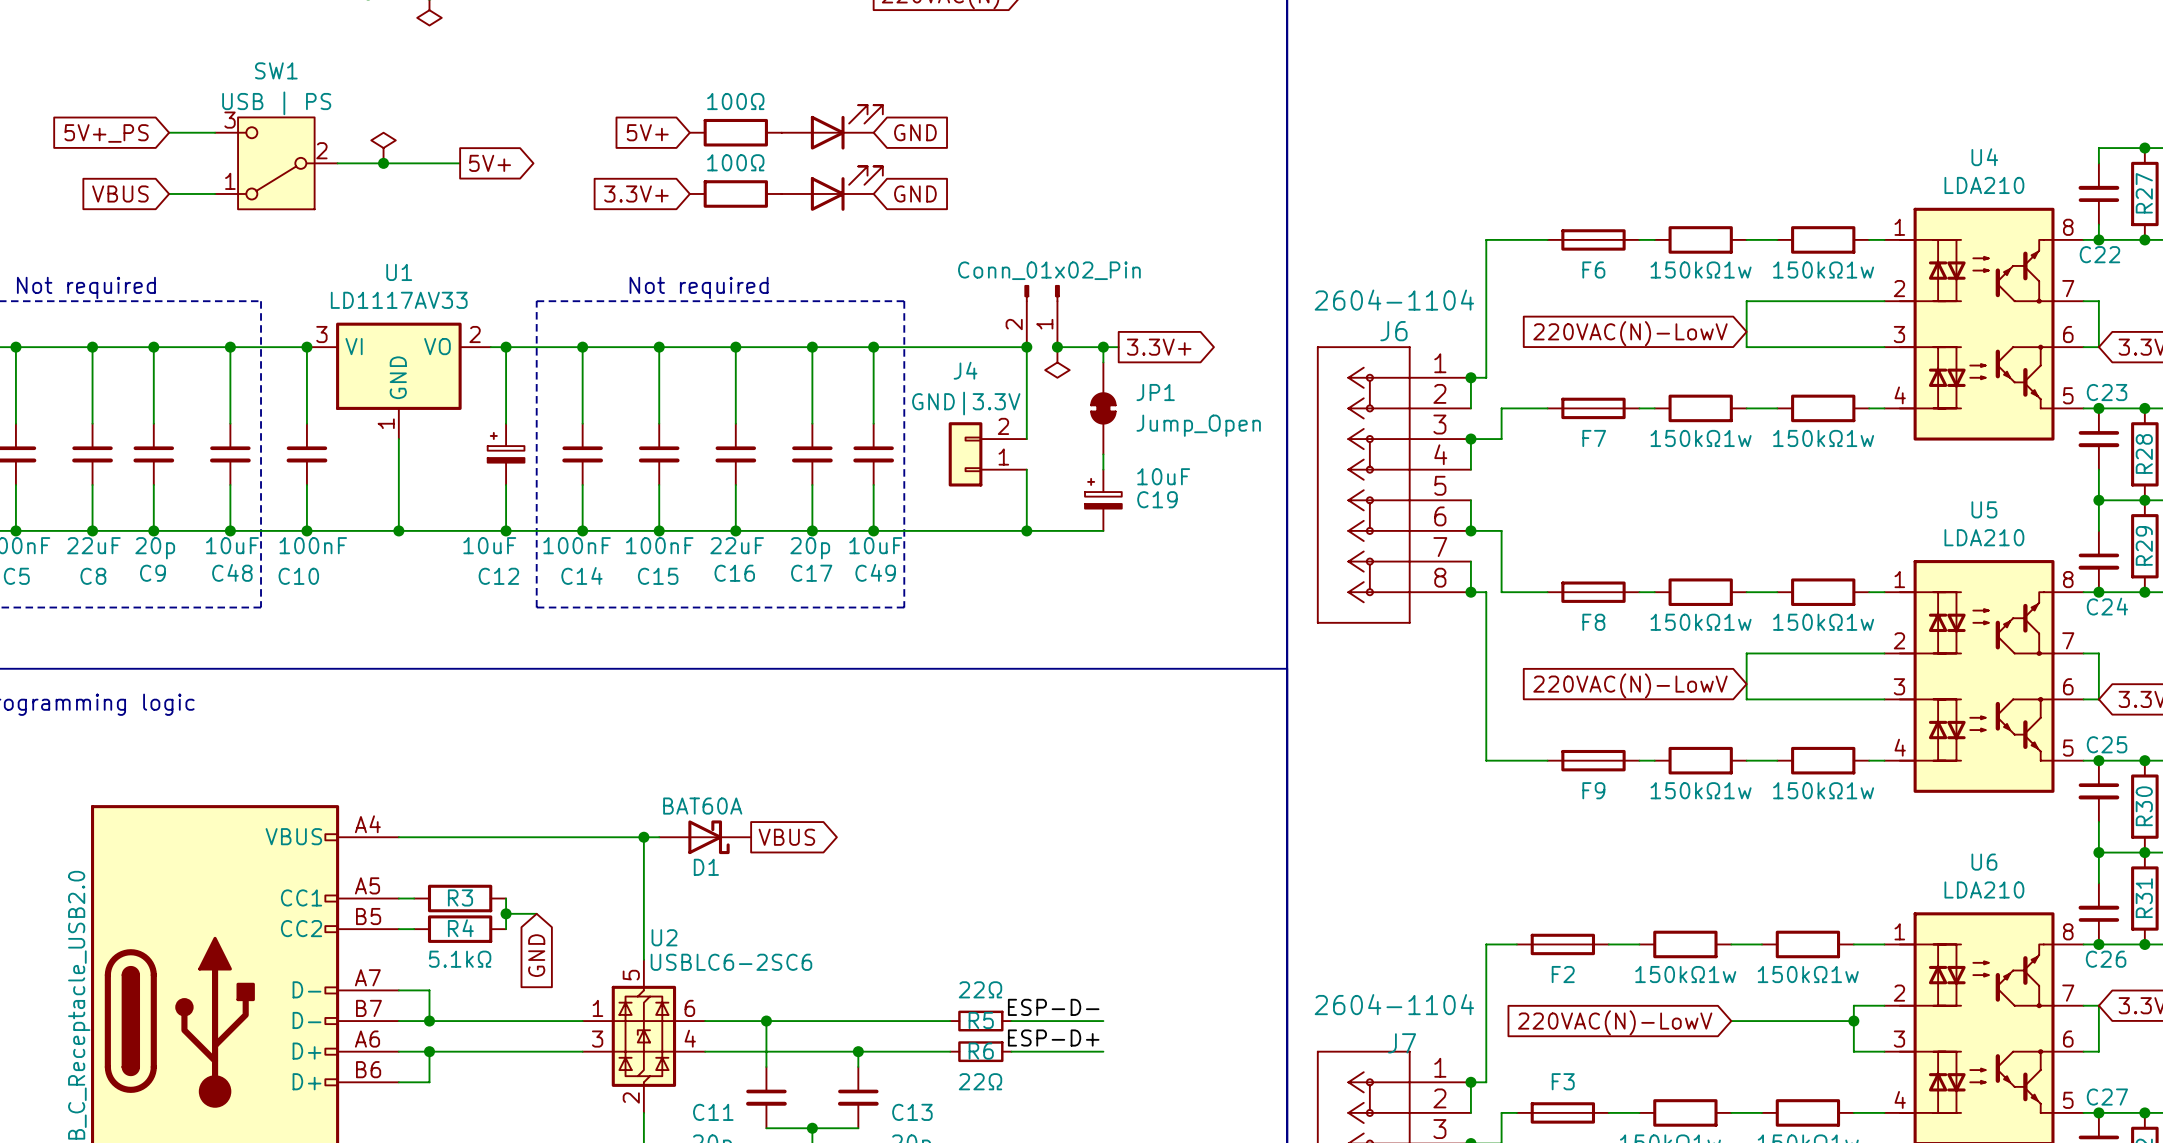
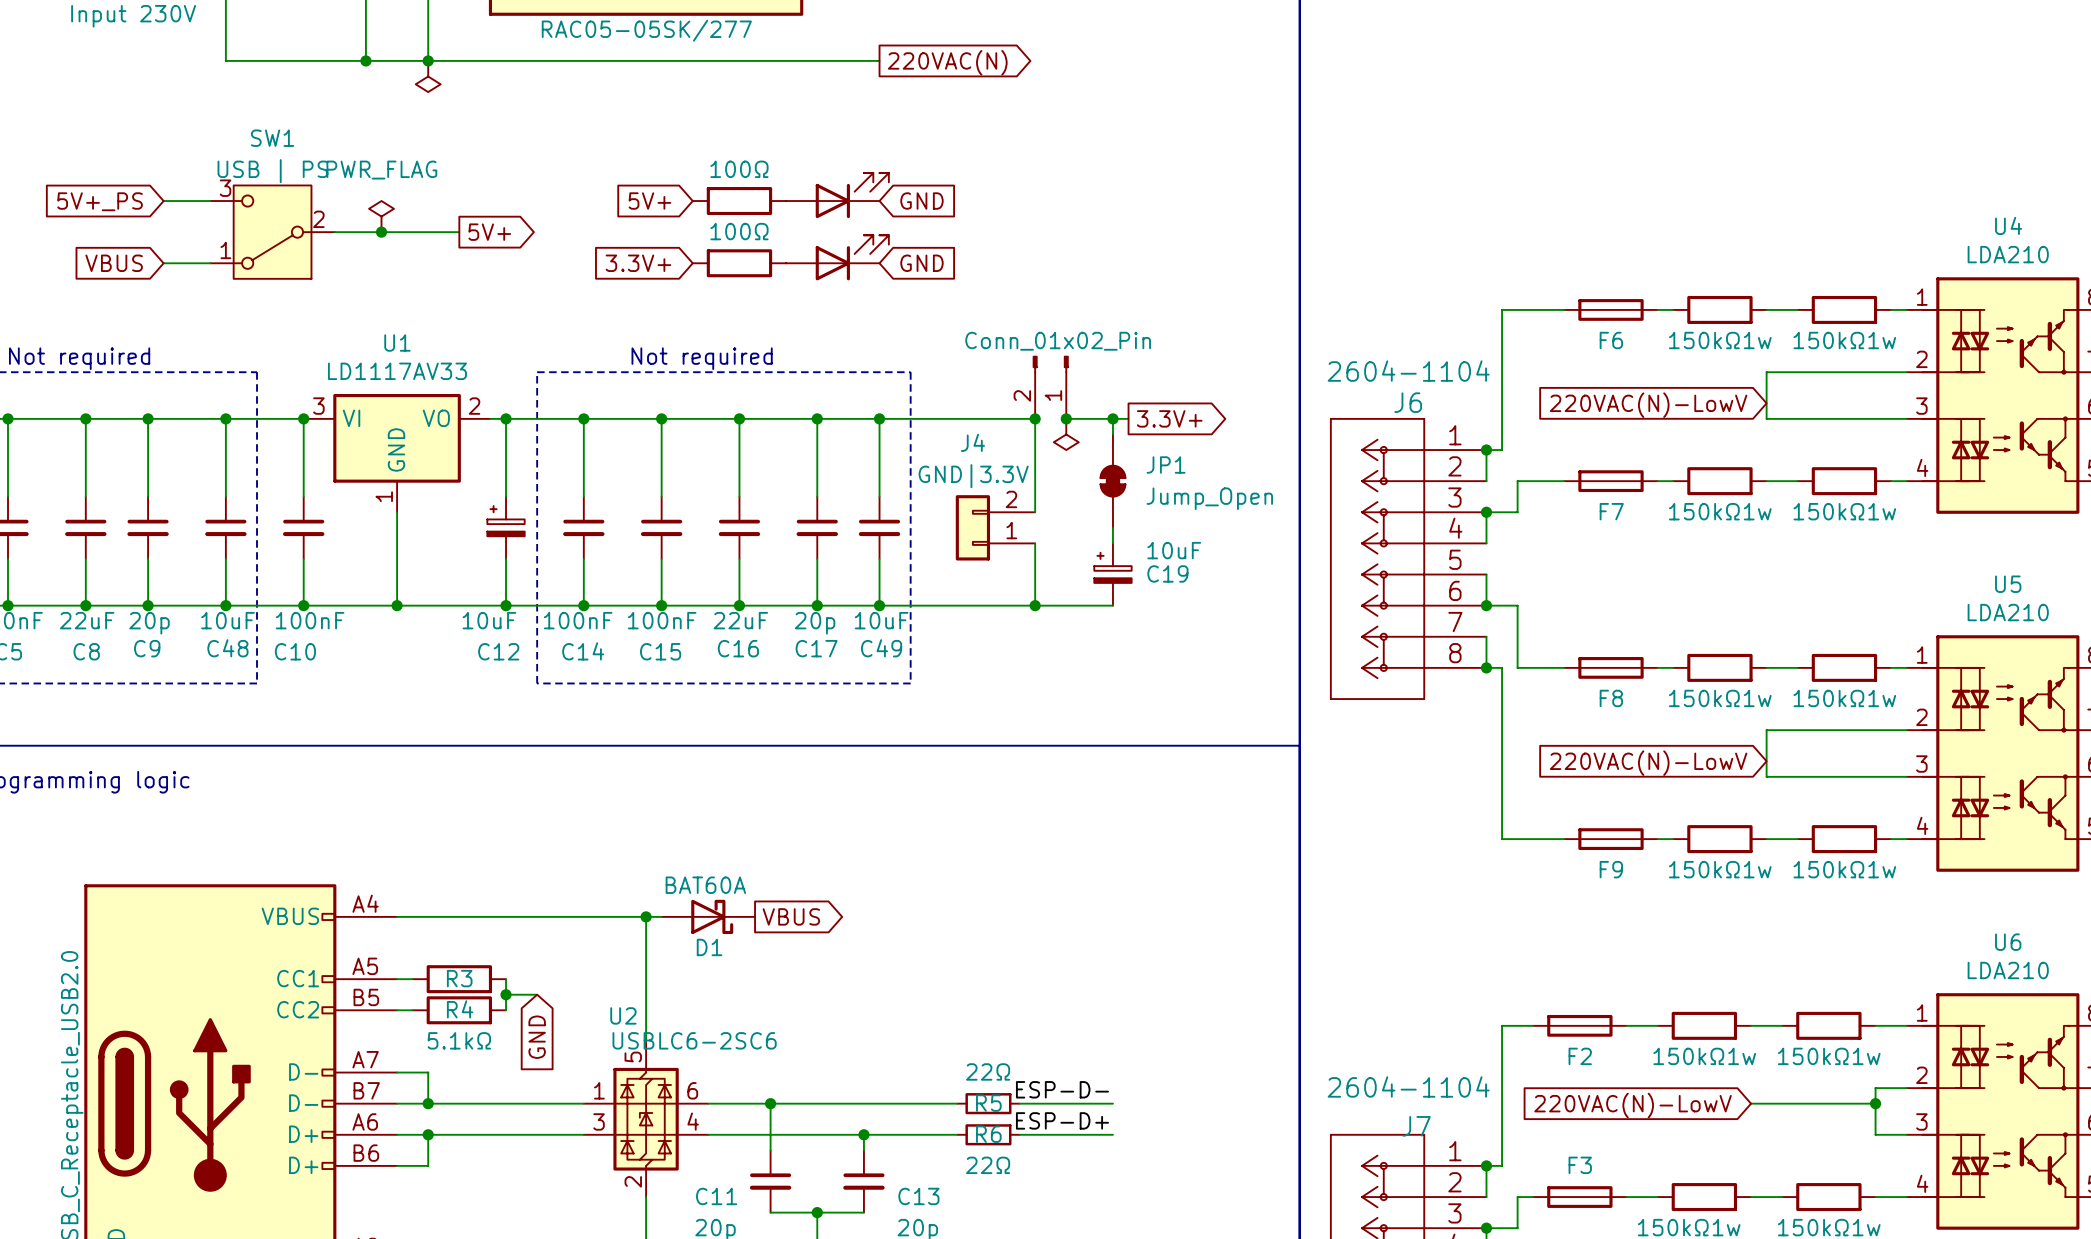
power symbol text: none -> PWR_FLAG (381, 170)
U2 name position: U2 (664, 937) -> U2 (623, 1015)
U2 value position: USBLC6-2SC6 (731, 962) -> USBLC6-2SC6 (694, 1040)

